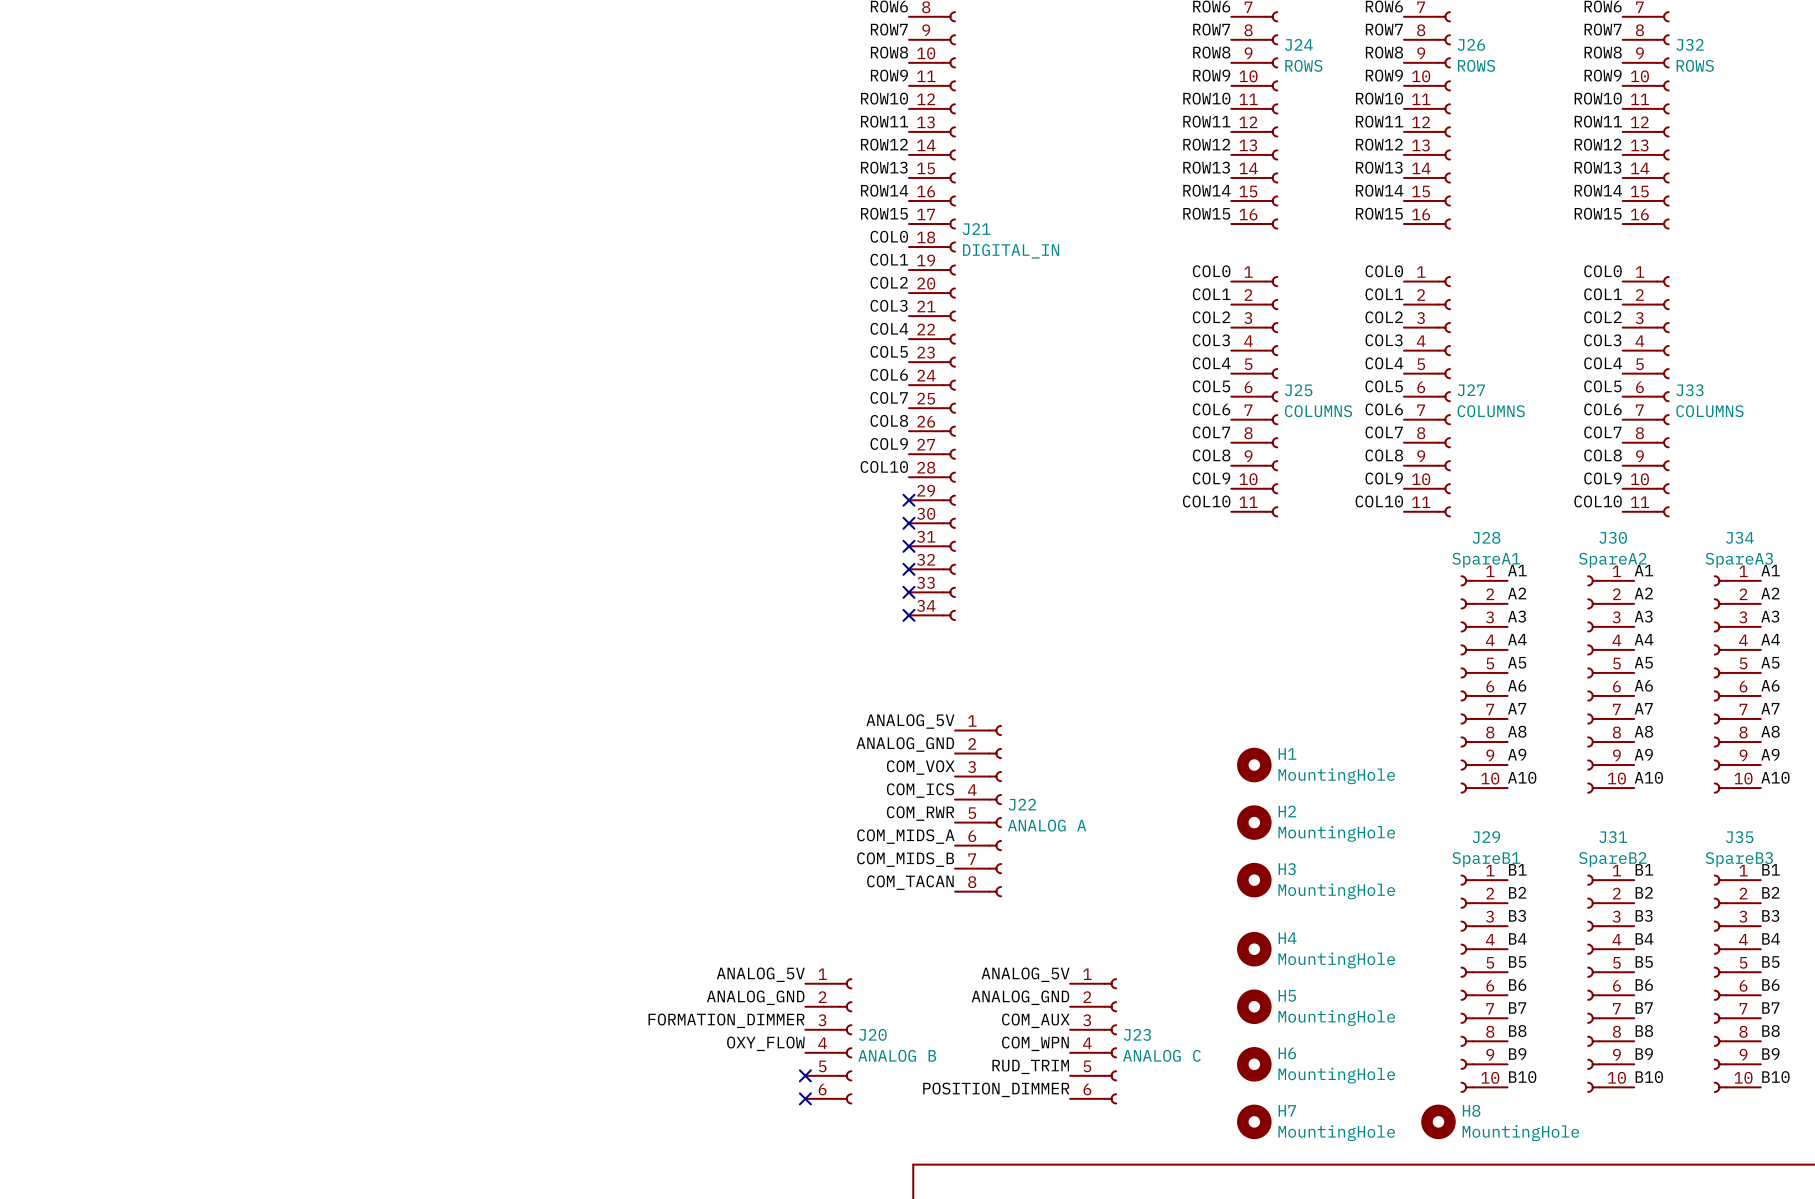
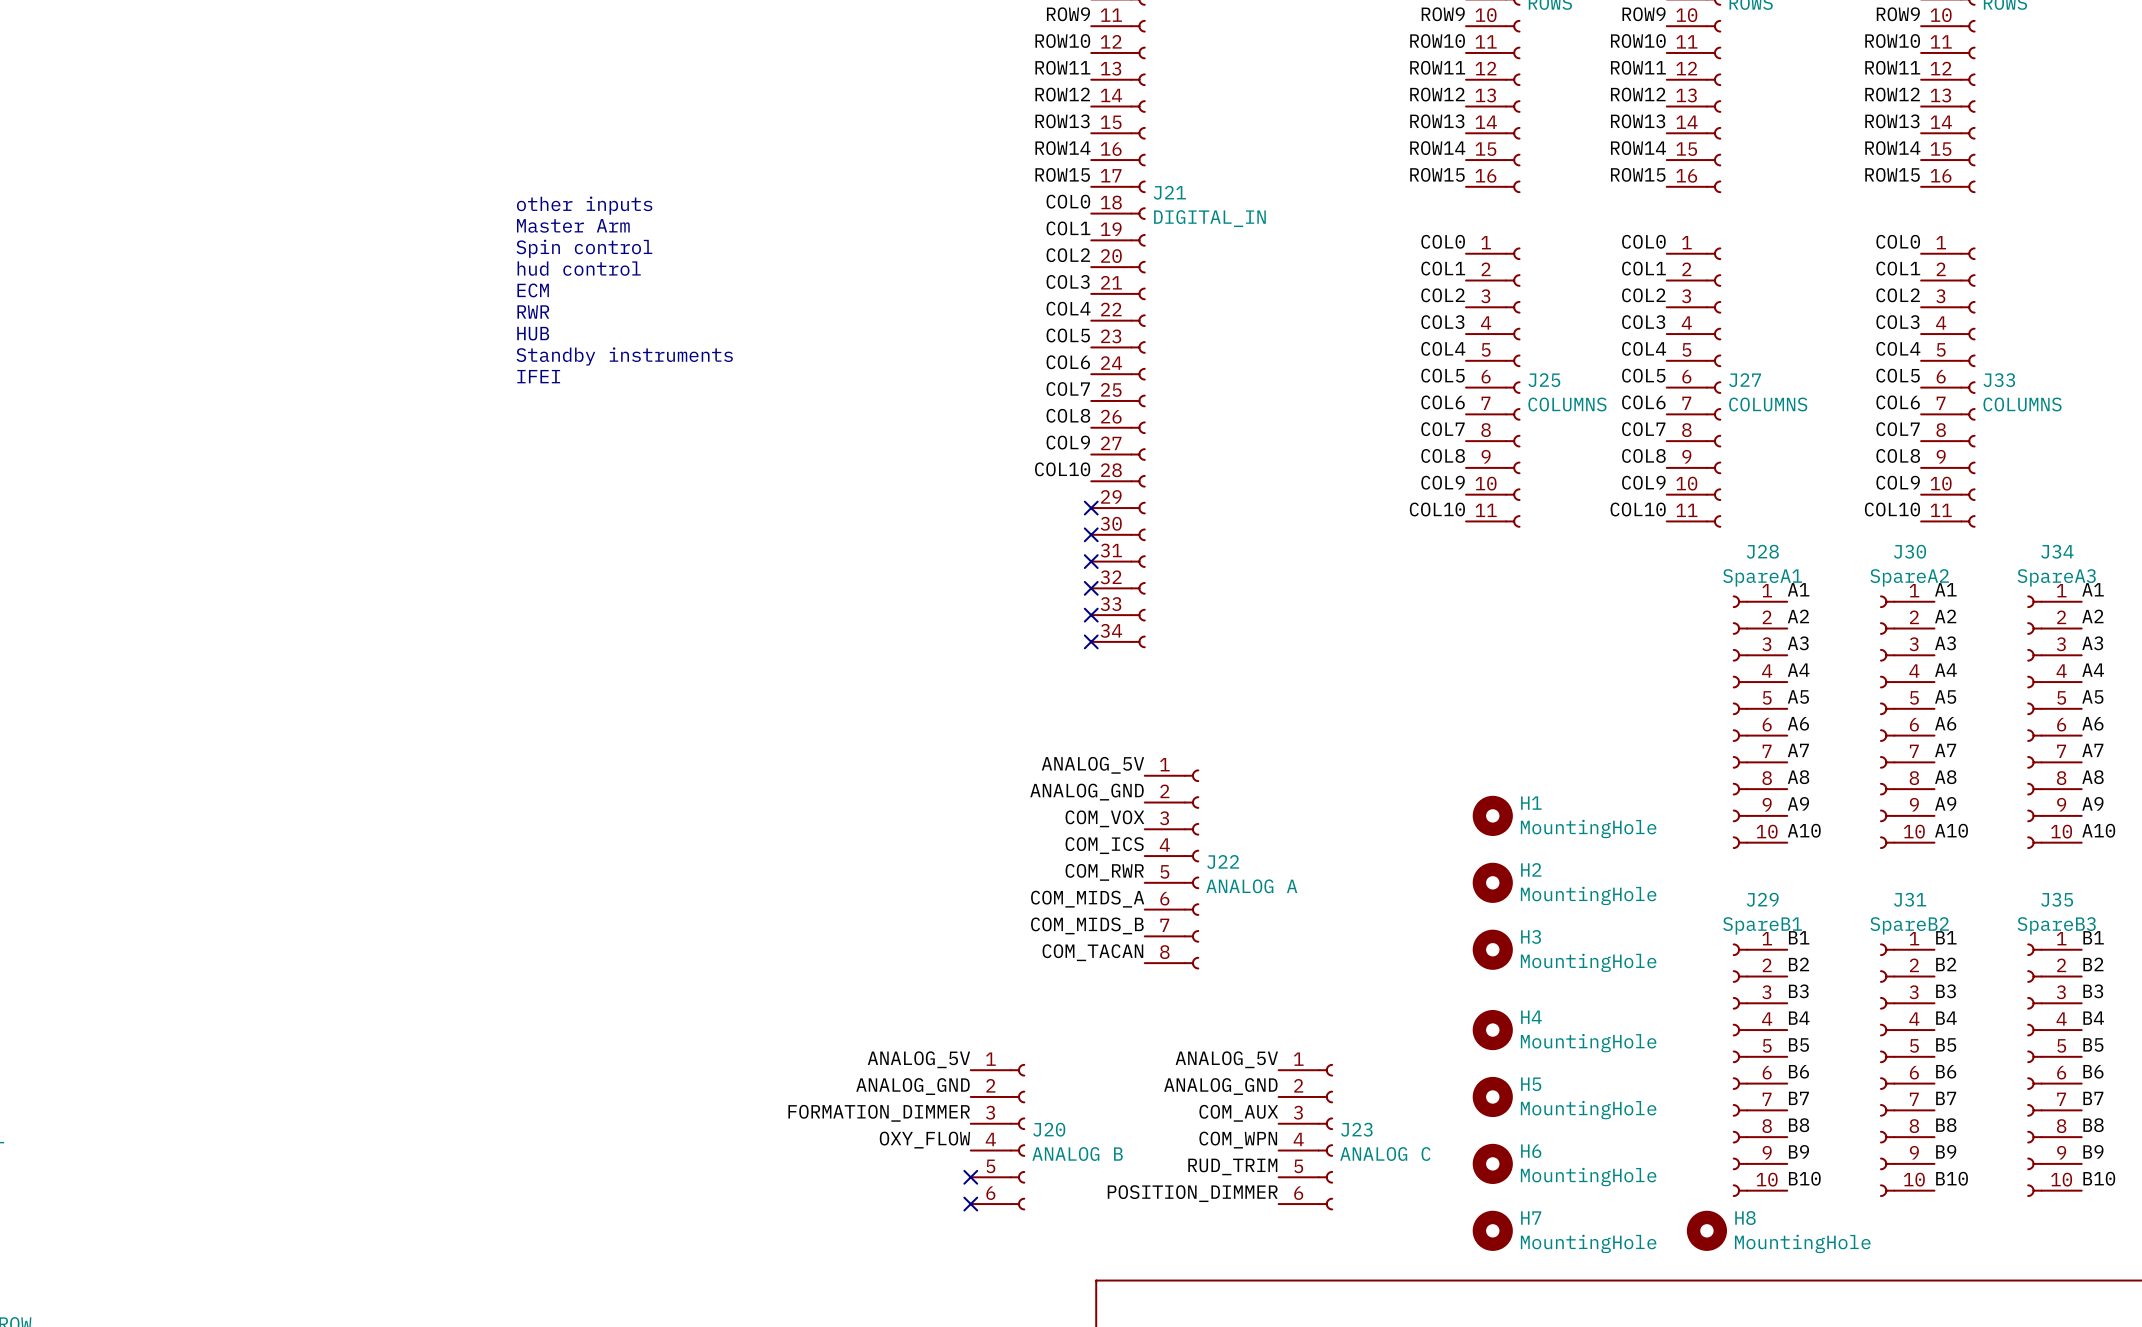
text: none -> other inputs (584, 205)
text: none -> Master Arm (573, 225)
text: none -> Spin control (584, 248)
text: none -> hud control (579, 268)
text: none -> ECM (533, 290)
text: none -> RWR (533, 311)
text: none -> HUB (533, 333)
text: none -> Standby instruments (624, 356)
text: none -> IFEI (538, 376)

